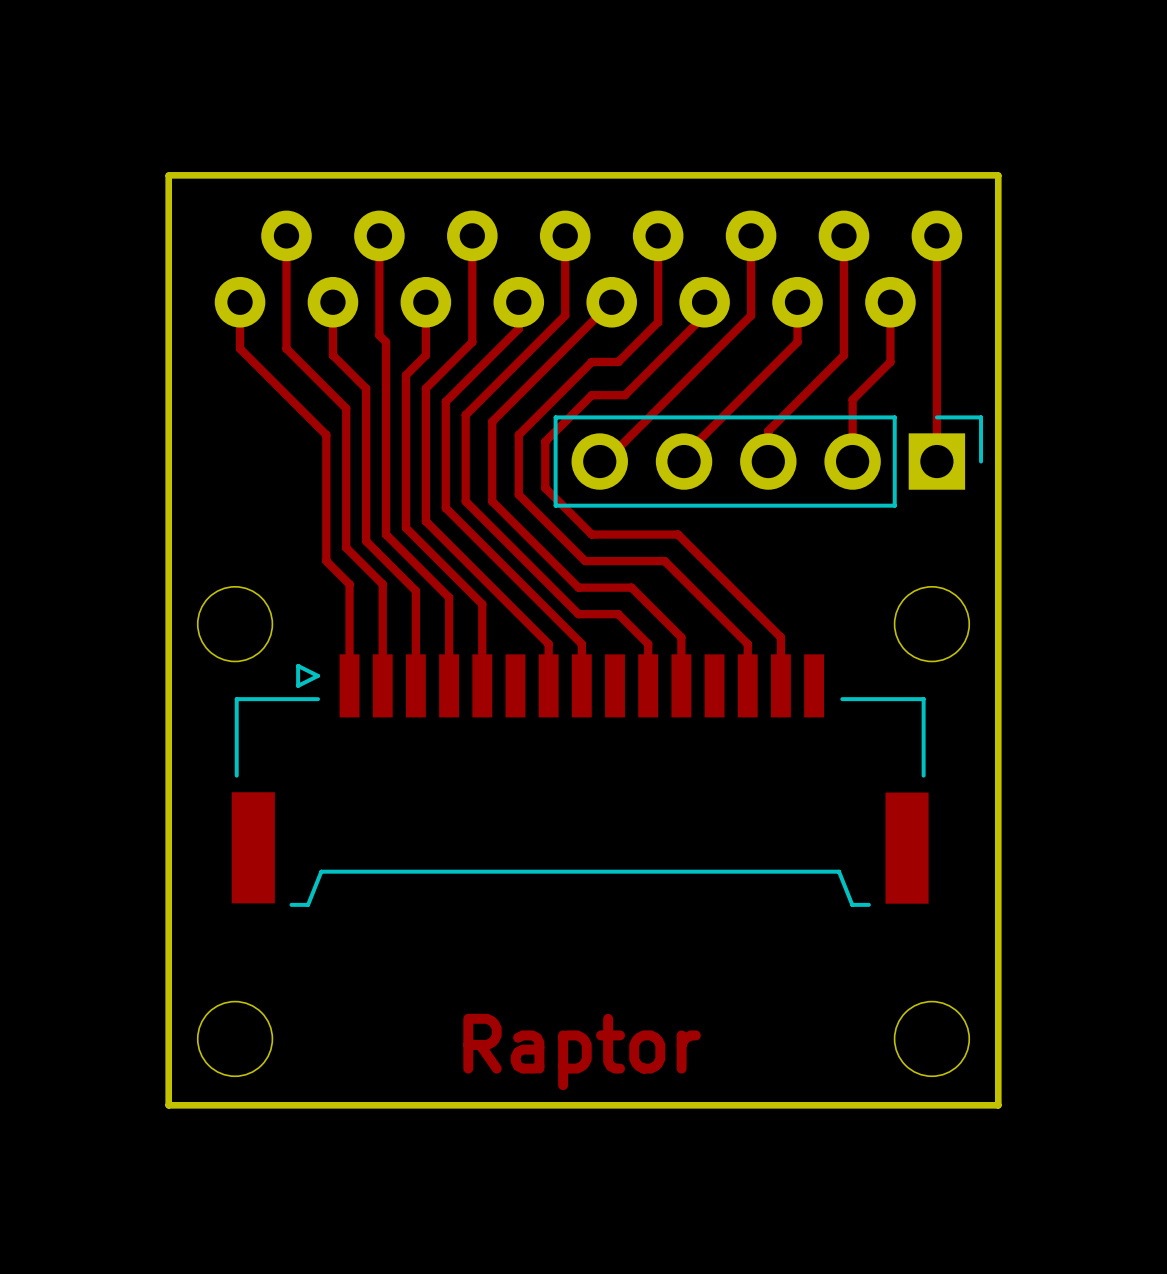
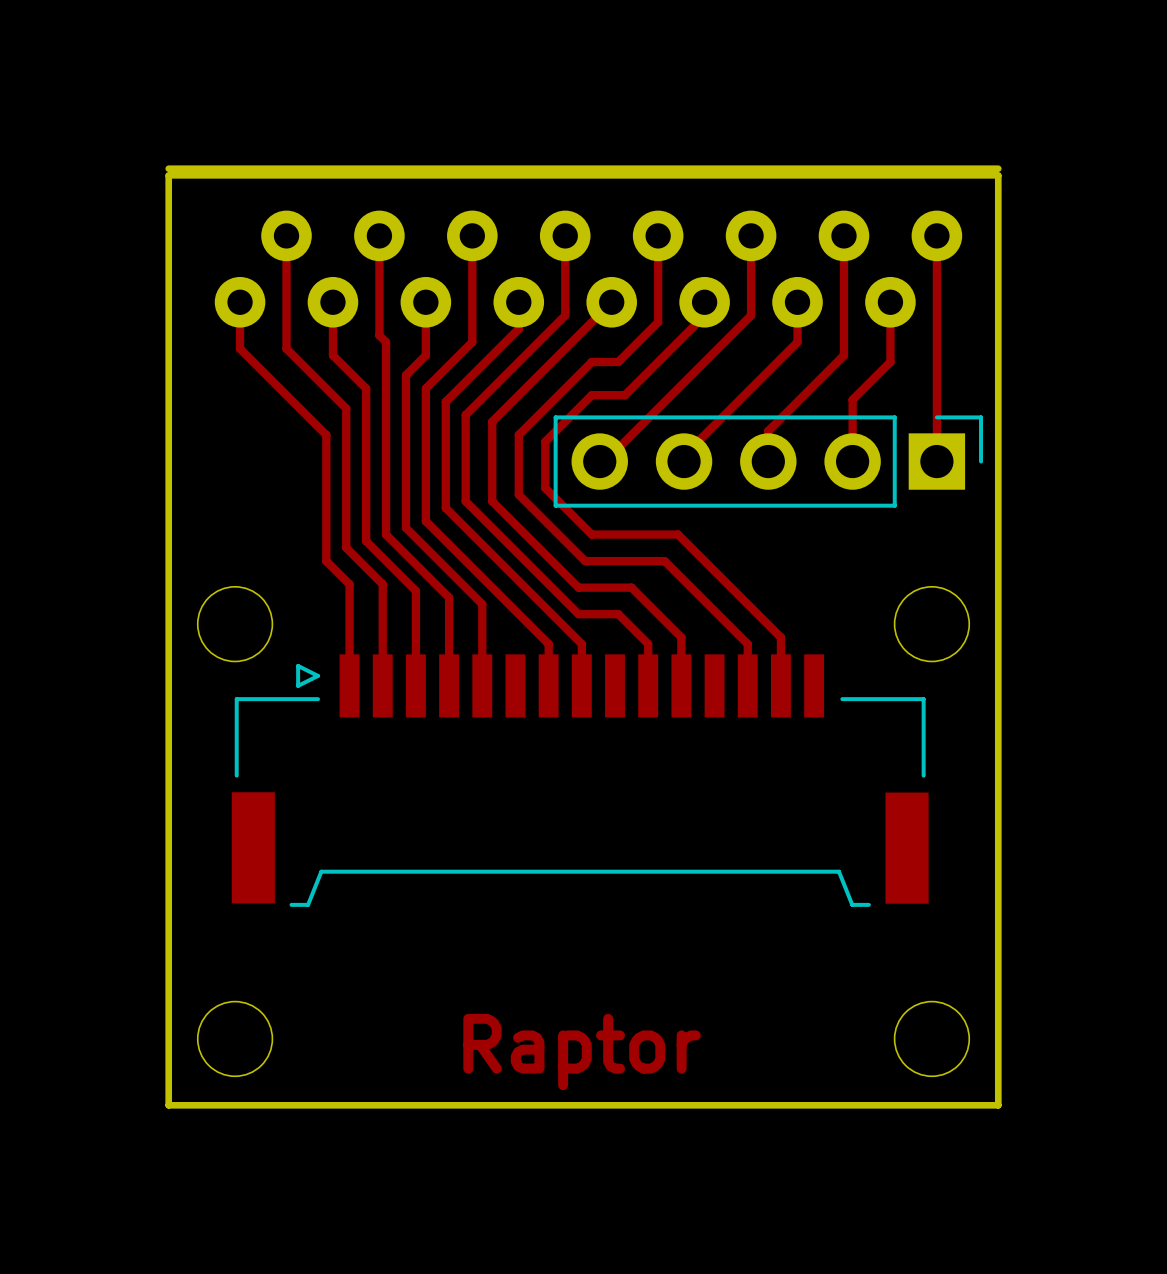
board edge: none -> (168, 168) (998, 168)

